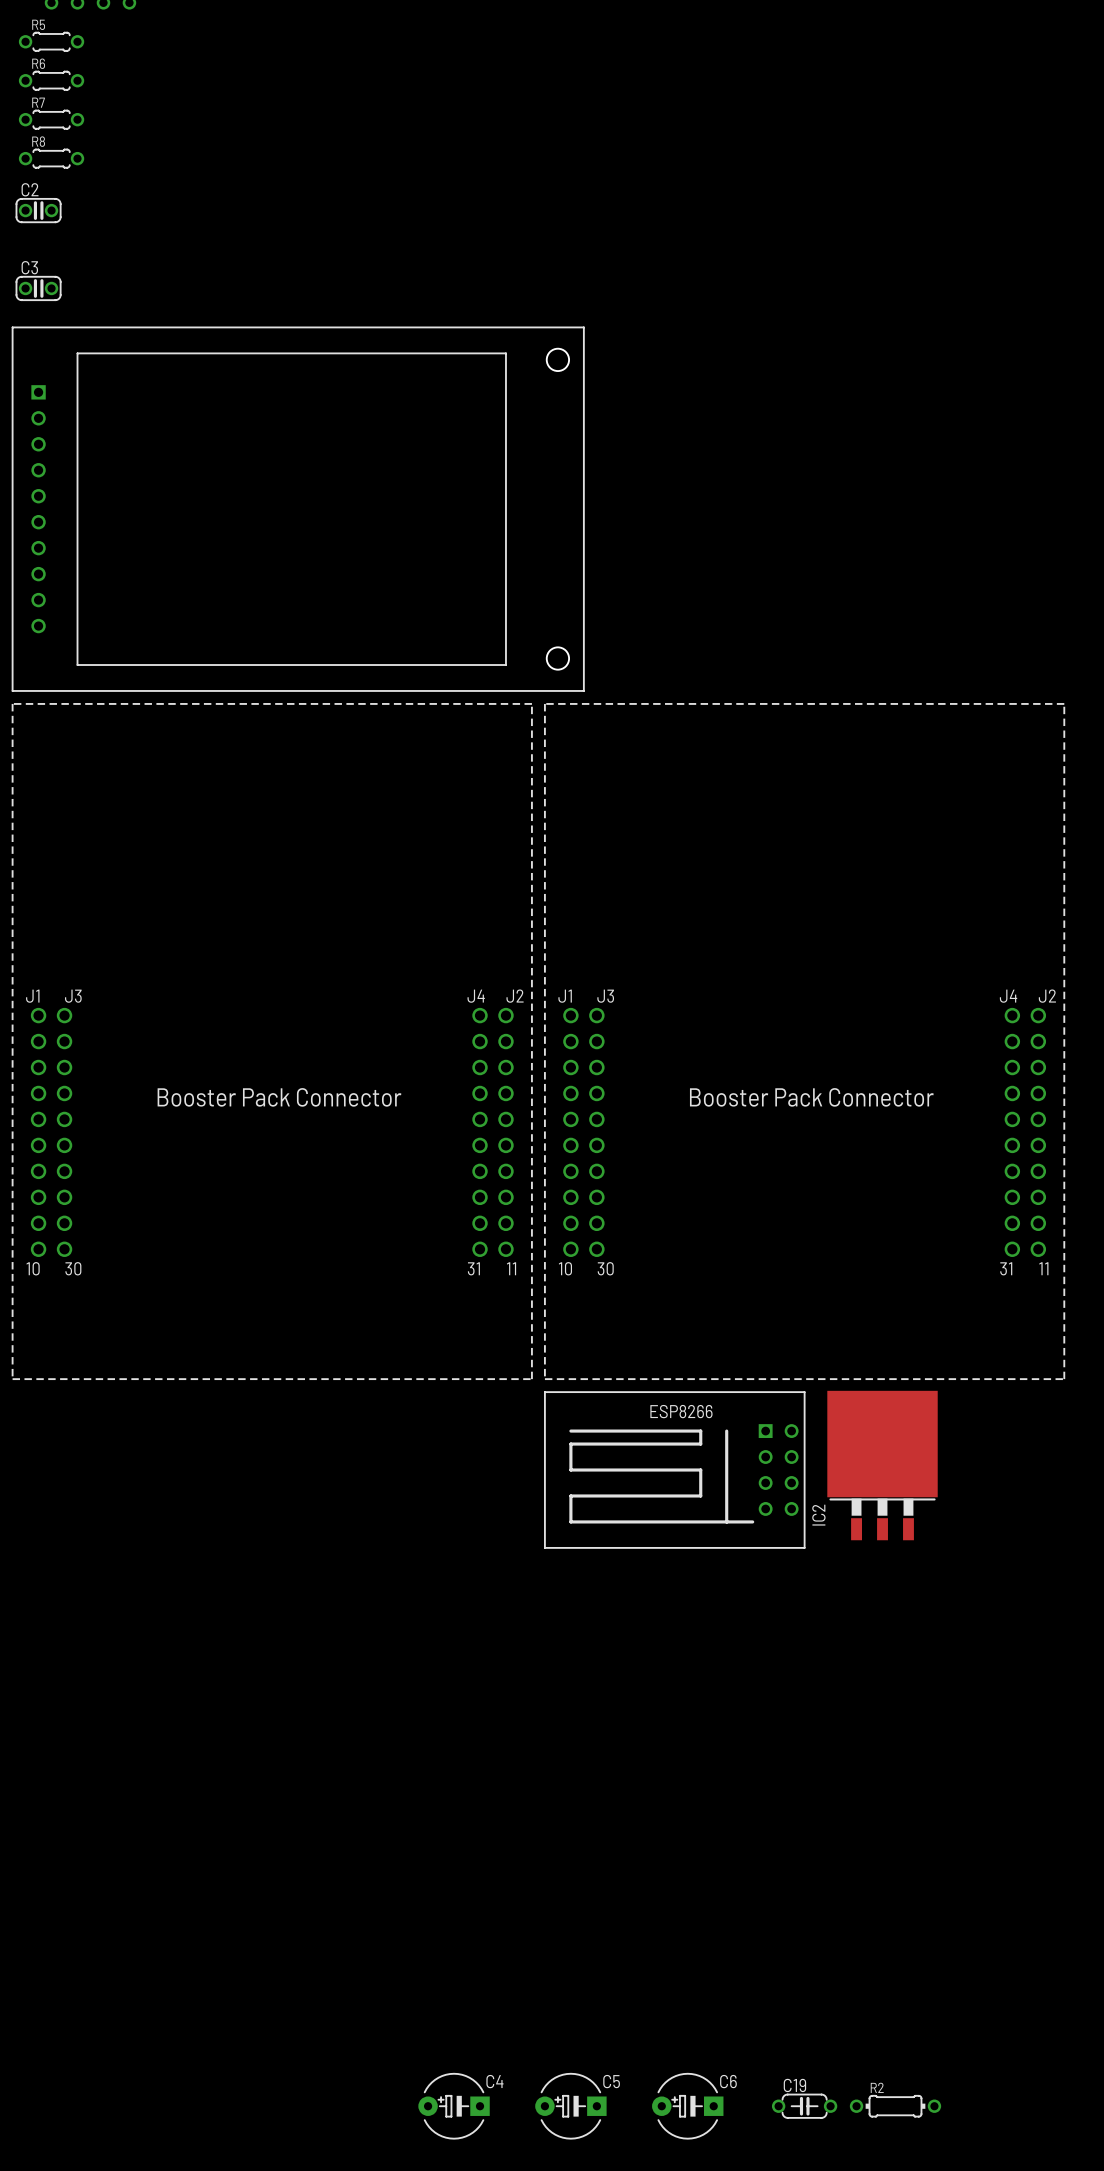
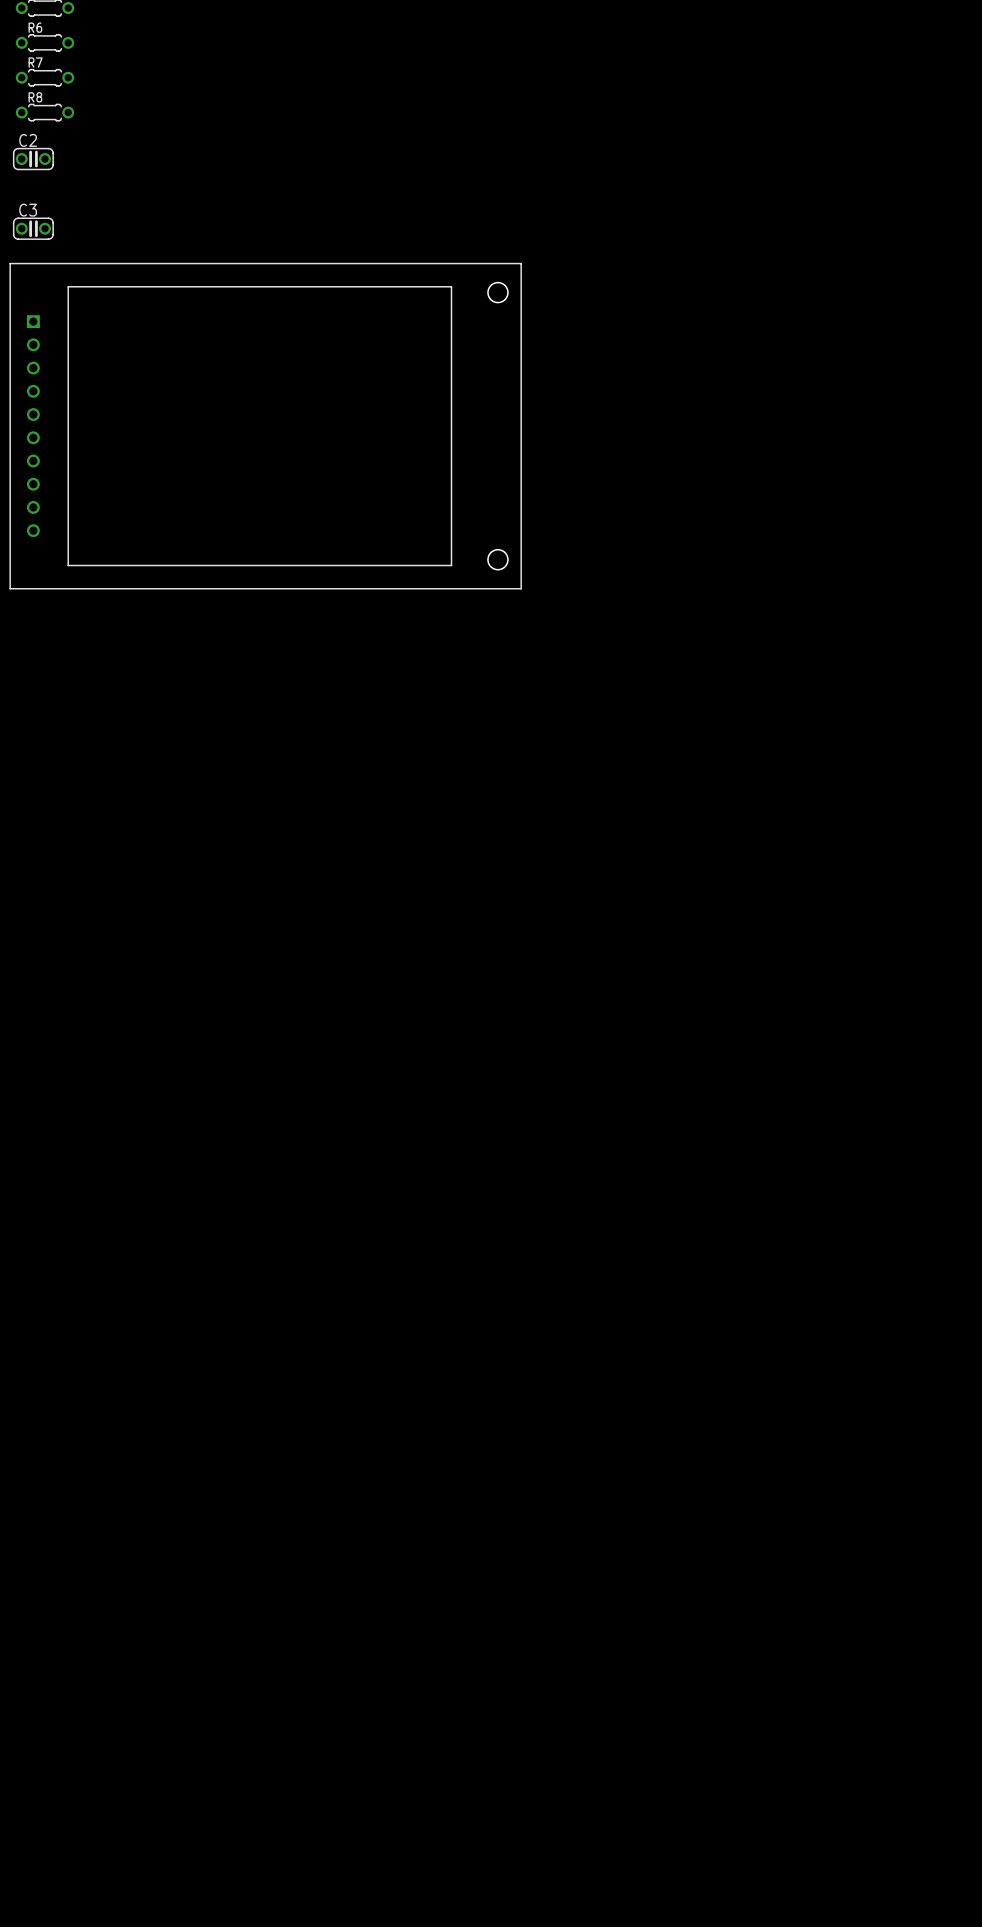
part: (272, 1041) -> none
part: (804, 1041) -> none
IC2: (882, 1465) -> none
part: (674, 1470) -> none
C4: (454, 2106) -> none
C5: (570, 2106) -> none
C6: (687, 2106) -> none
C19: (804, 2106) -> none
R2: (895, 2106) -> none

